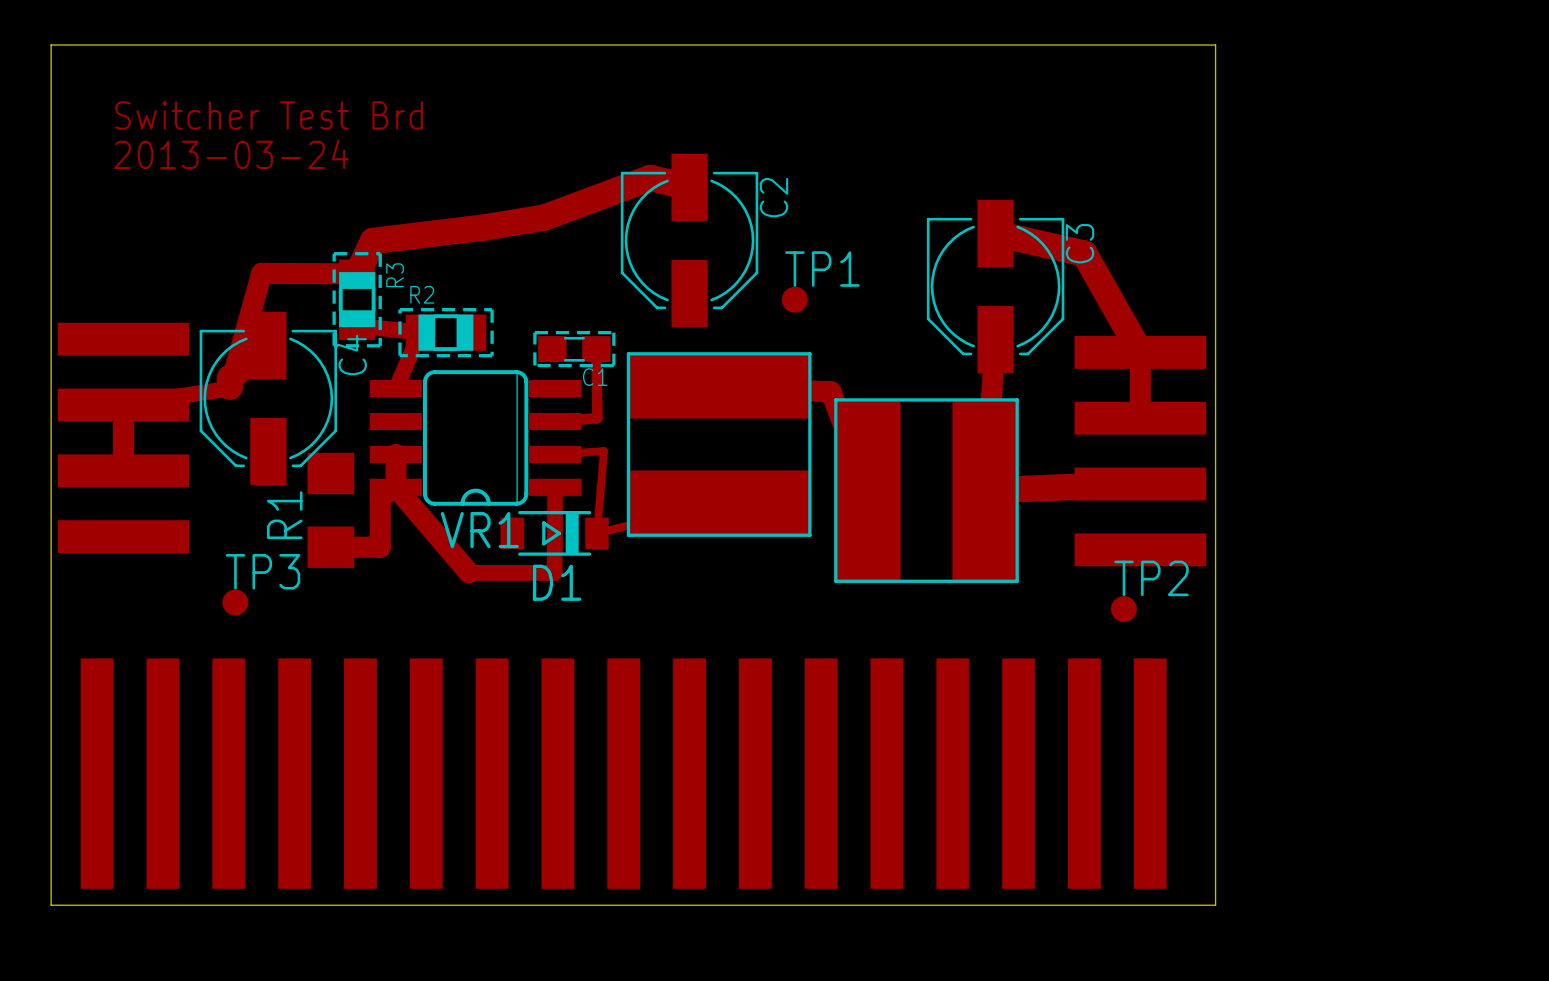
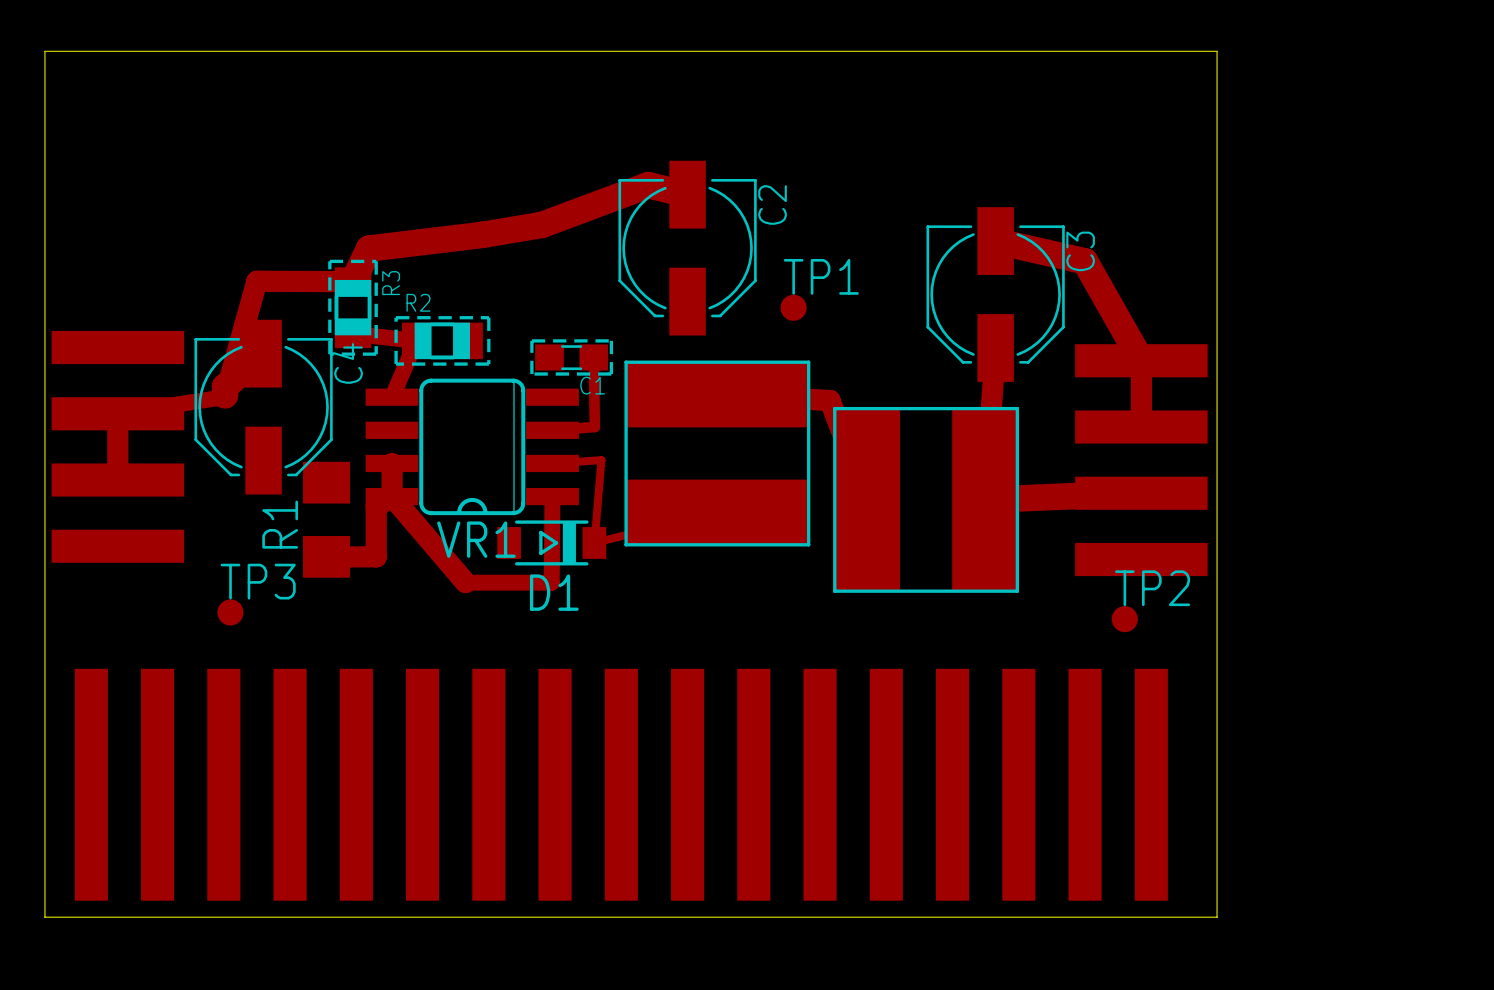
text: Switcher Test Brd (269, 115) -> none
text: 2013-03-24 (231, 154) -> none

